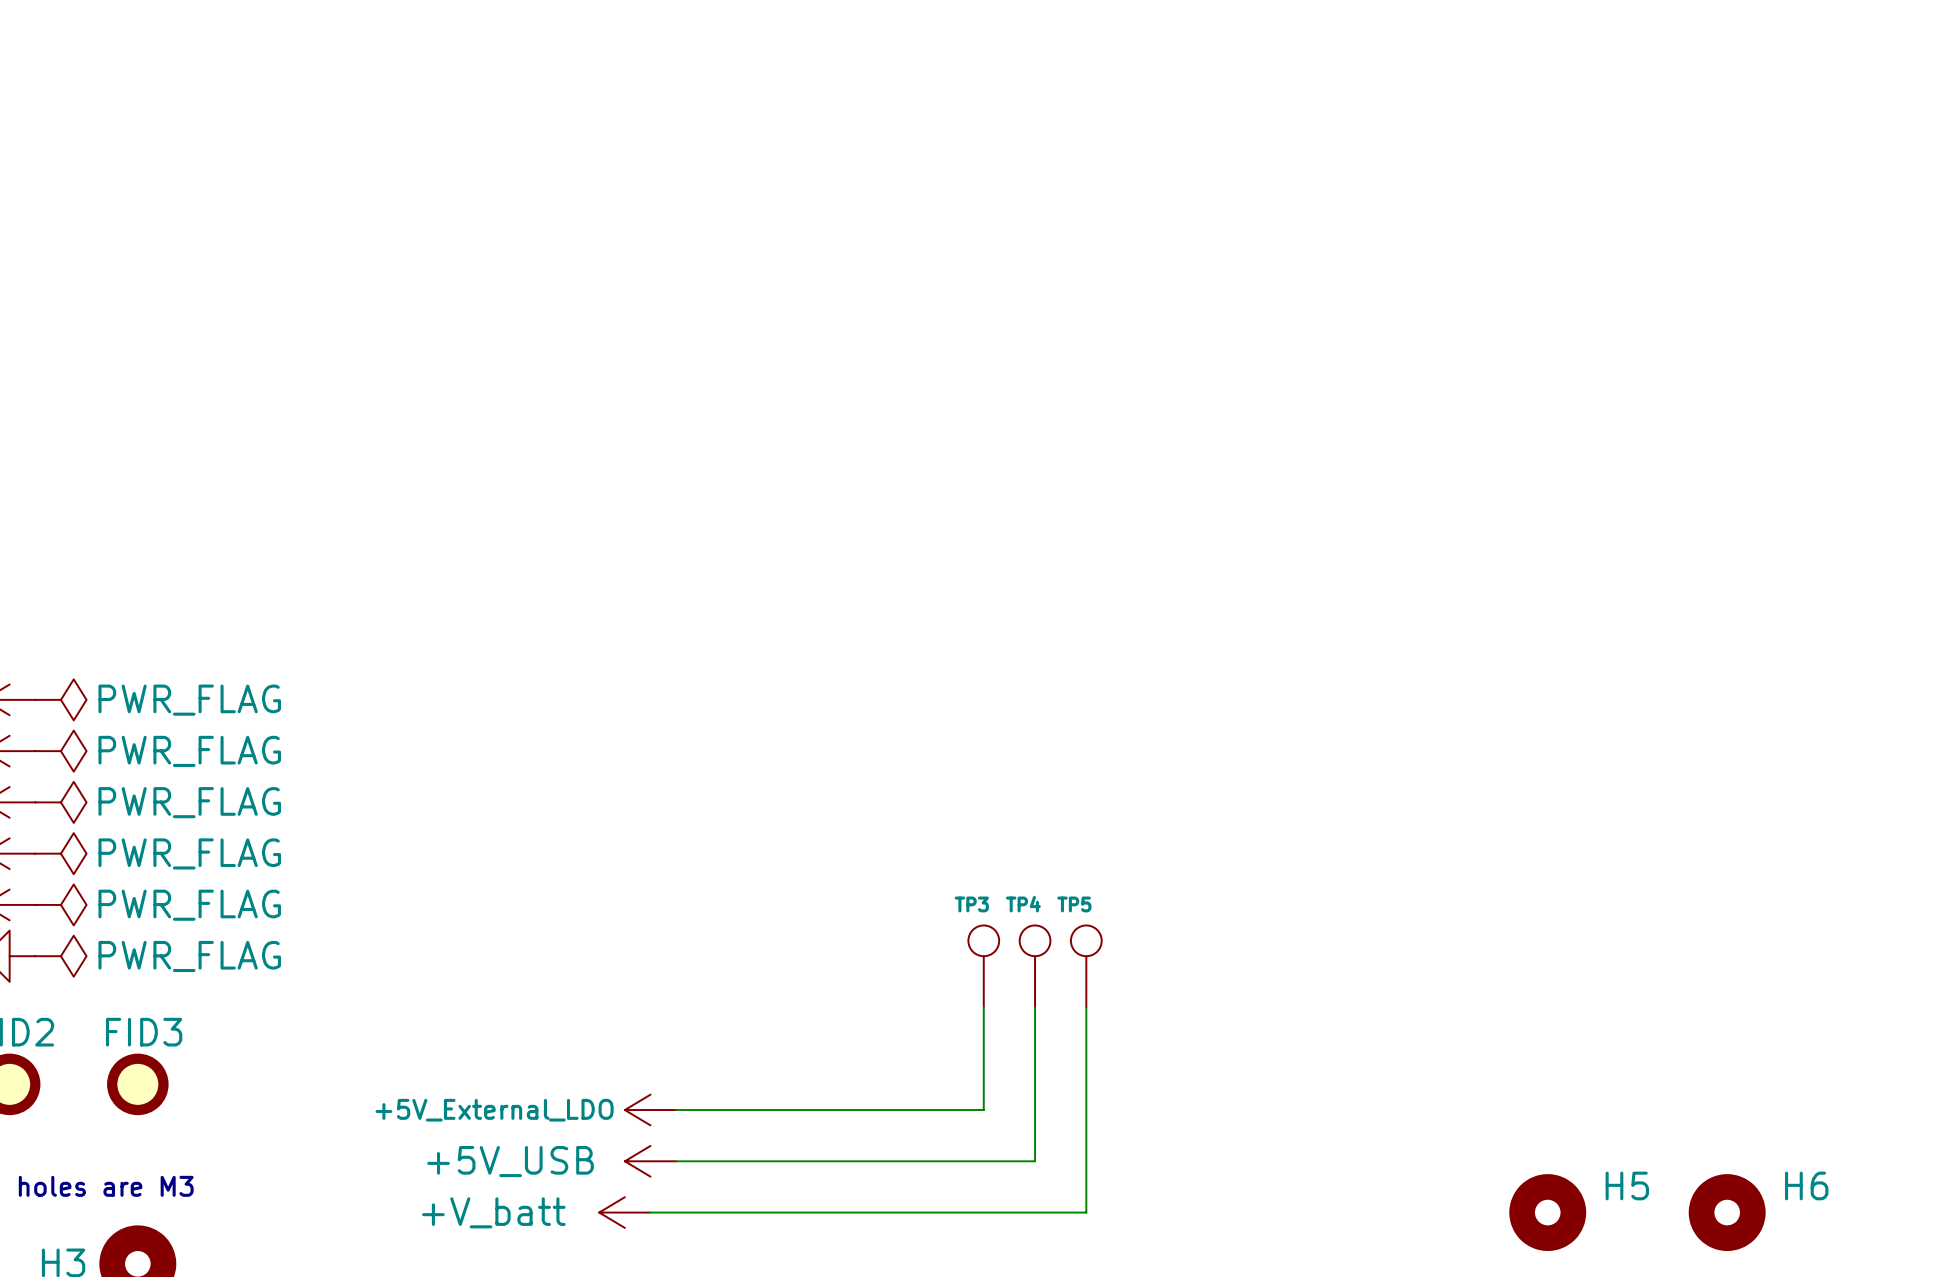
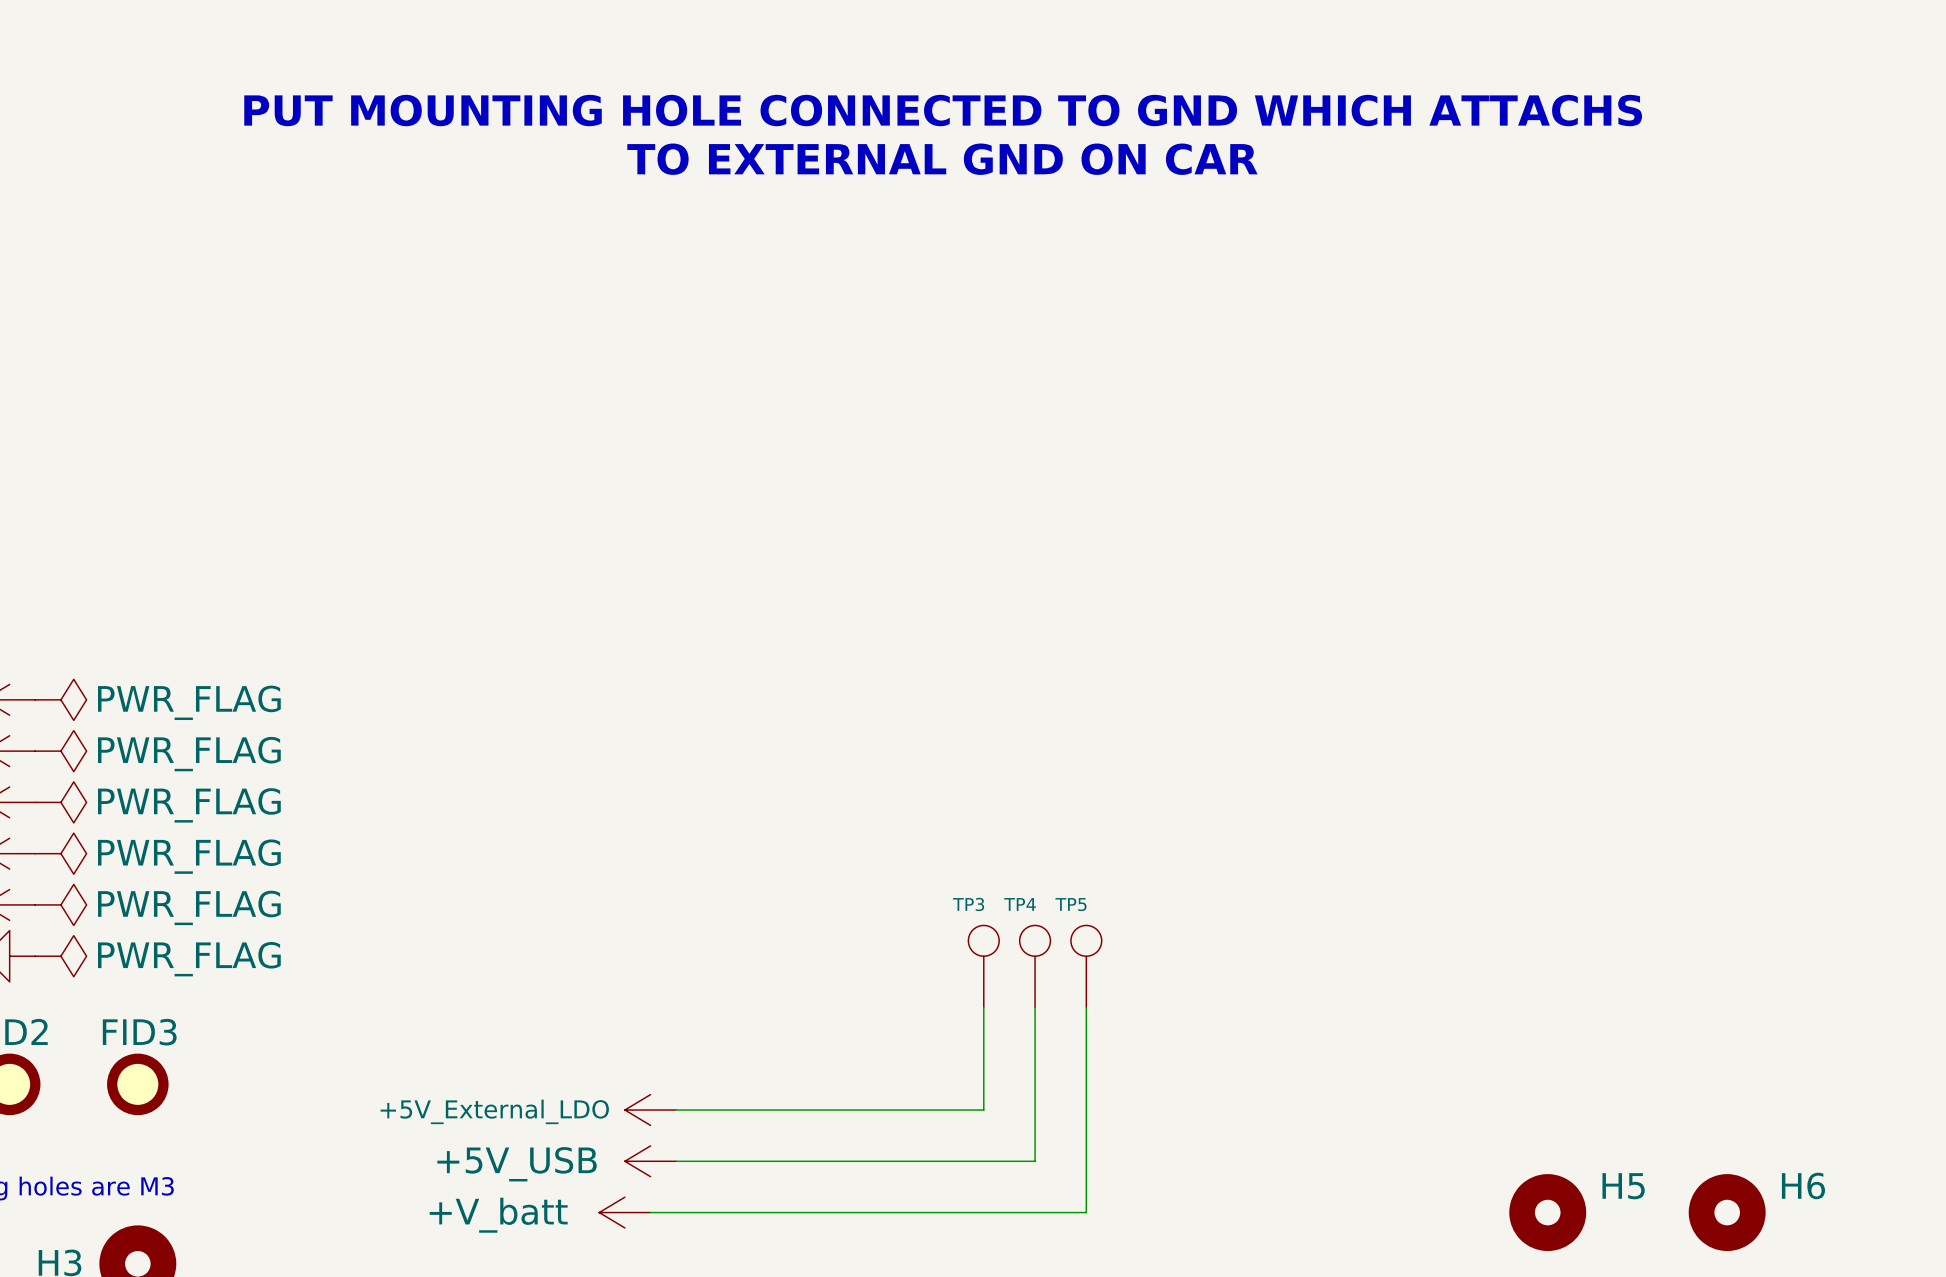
text: none -> PUT MOUNTING HOLE CONNECTED TO GND WHICH ATTACHS (943, 110)
text: none -> TO EXTERNAL GND ON CAR (942, 159)

